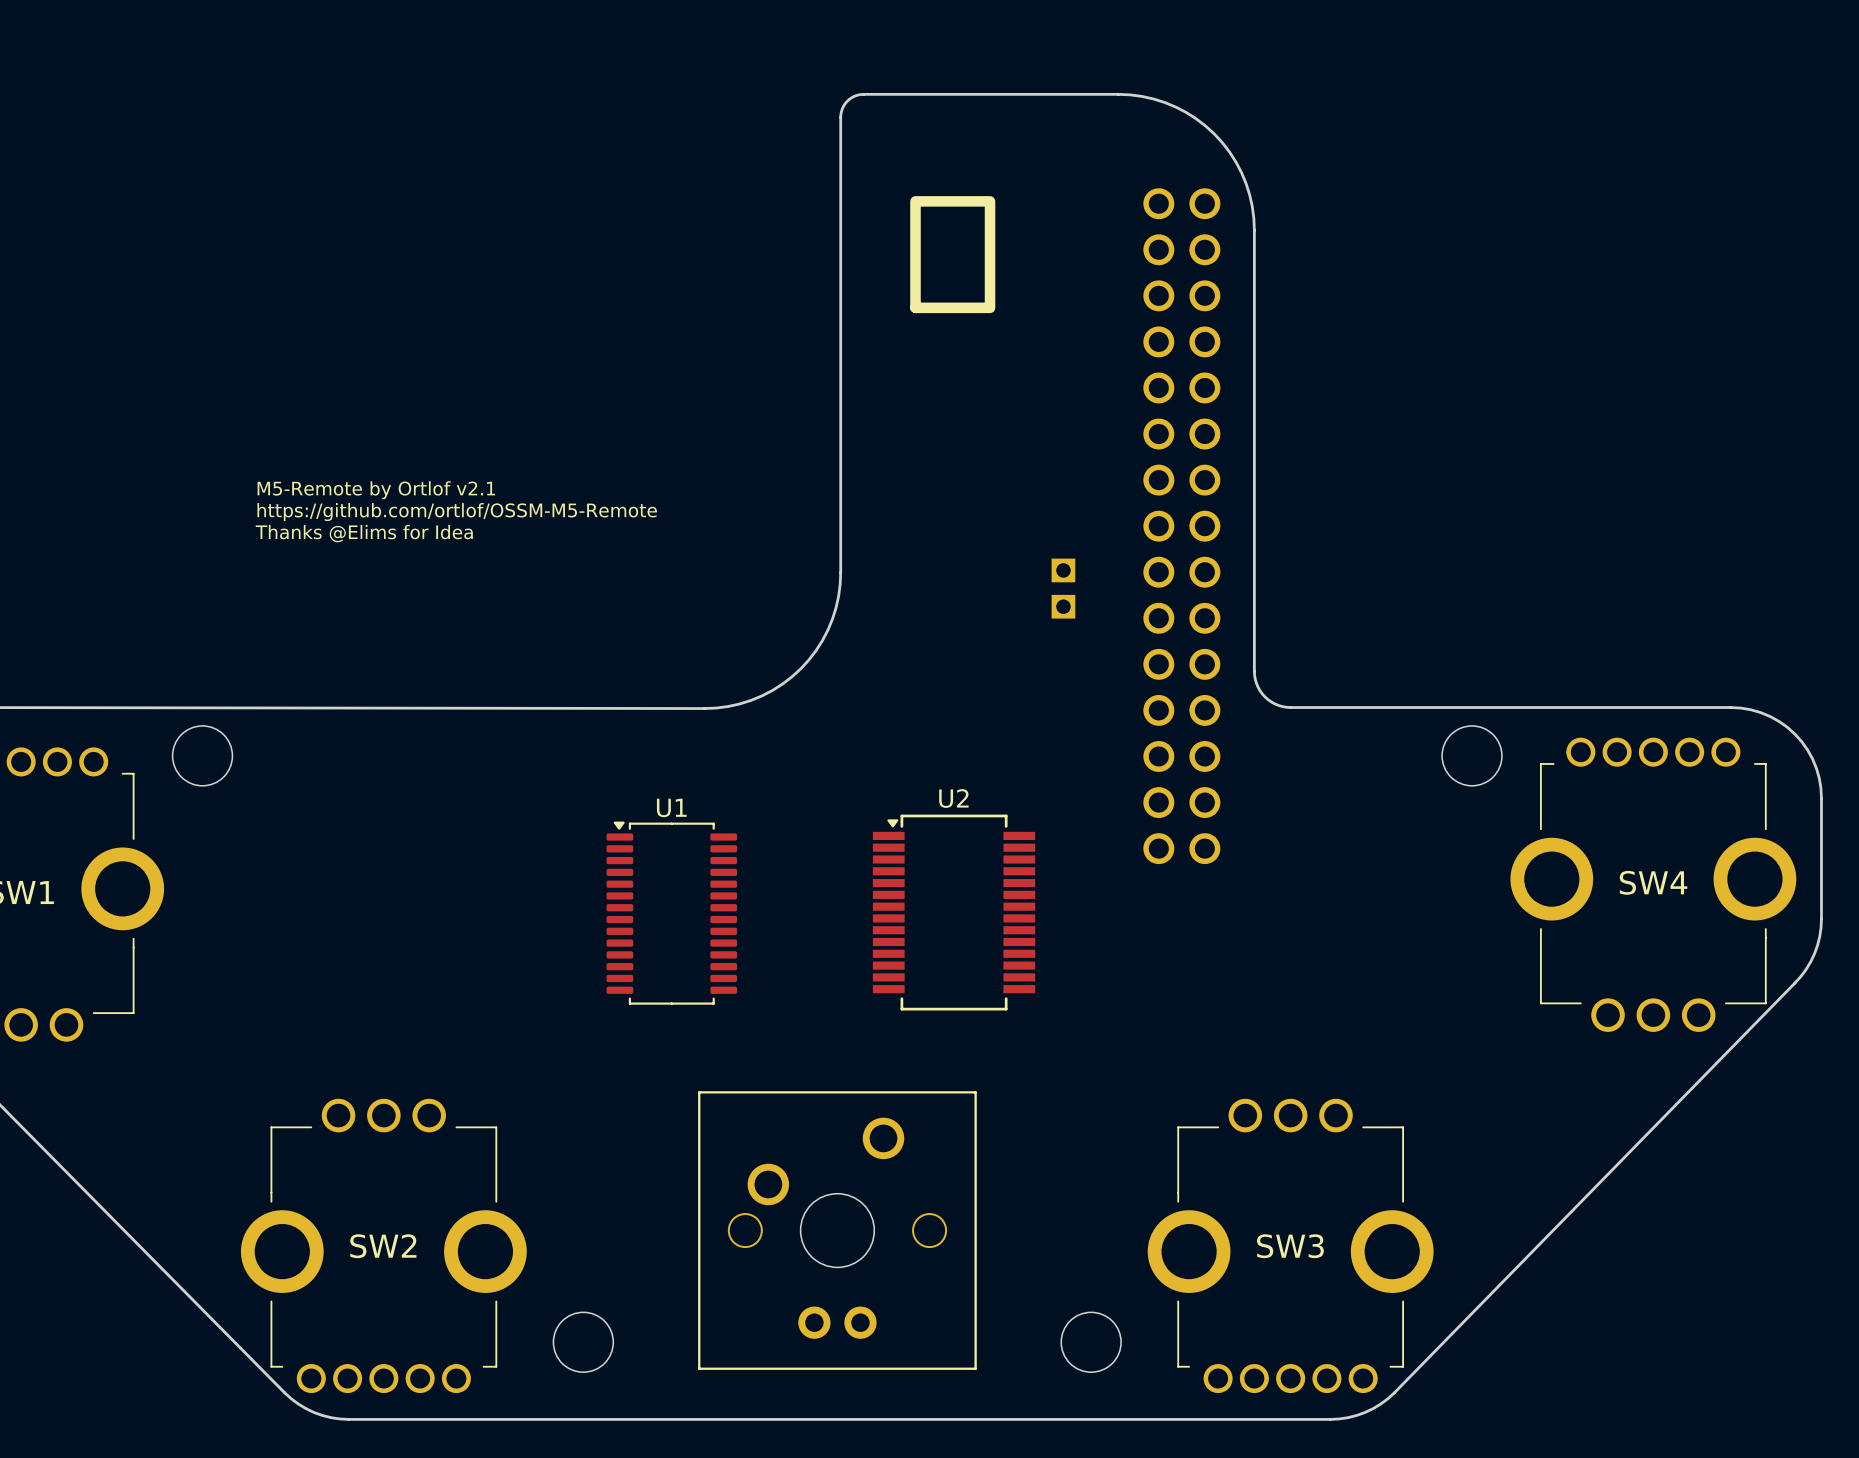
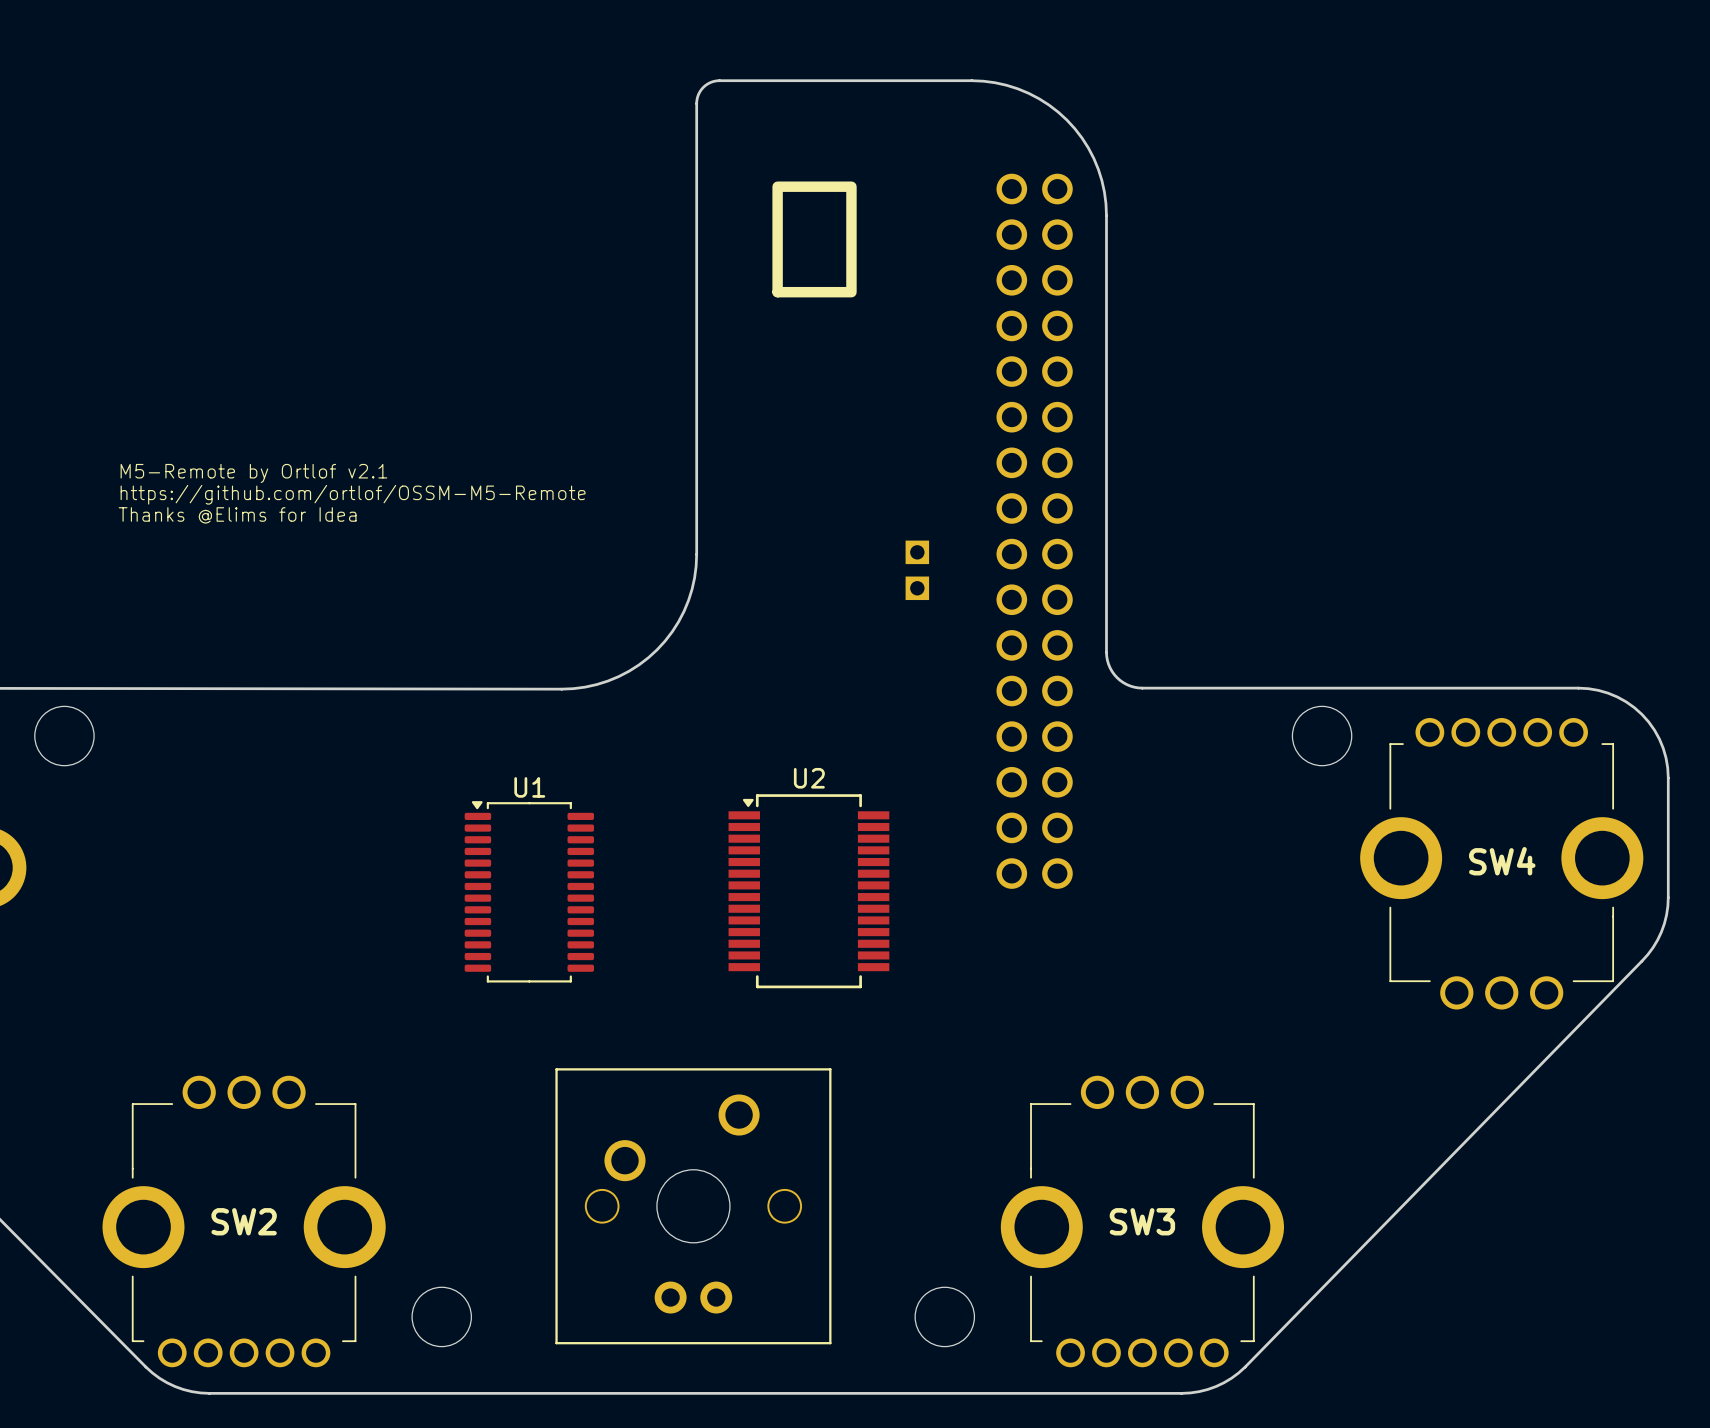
part: none -> (1034, 531)

